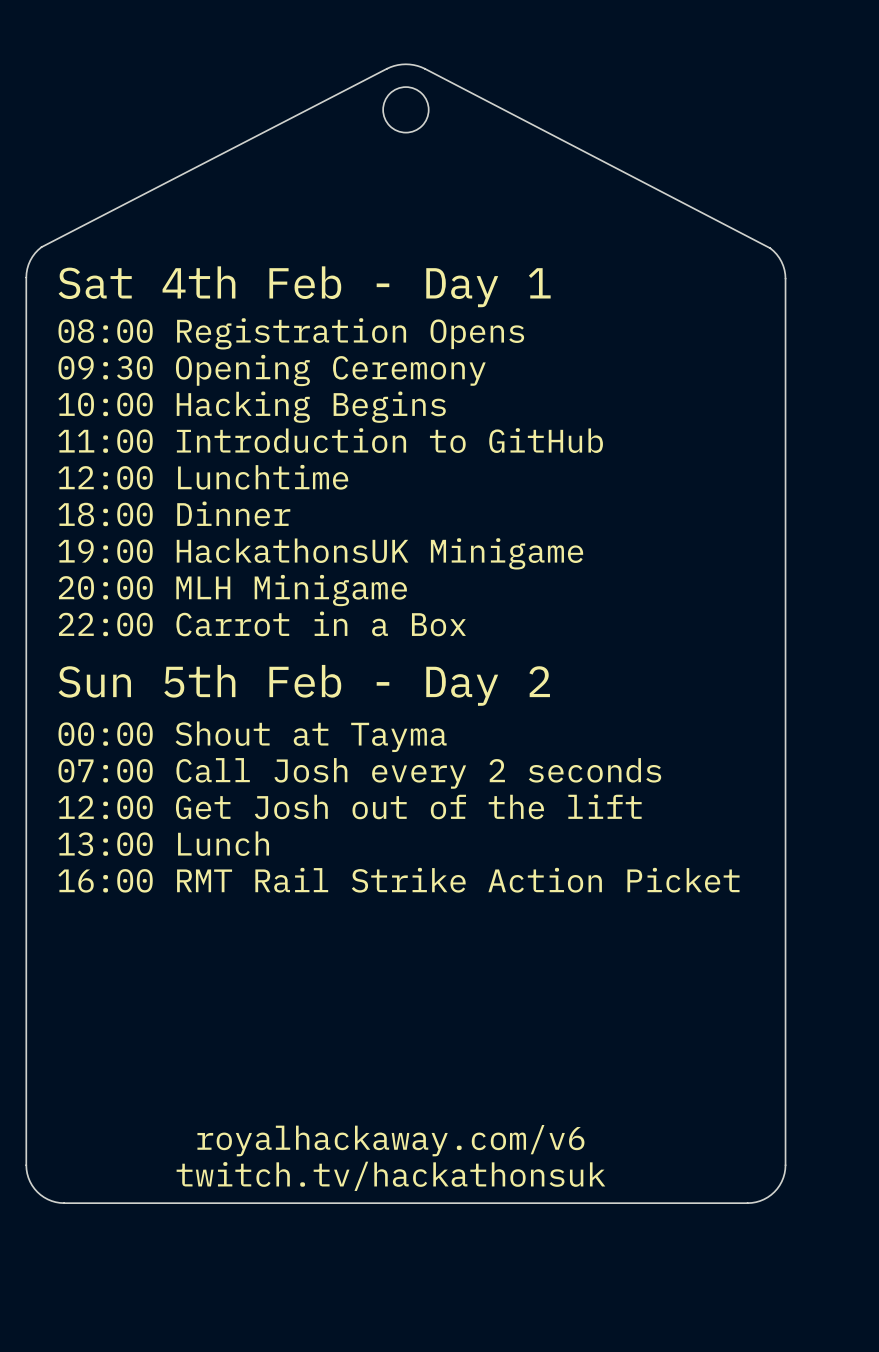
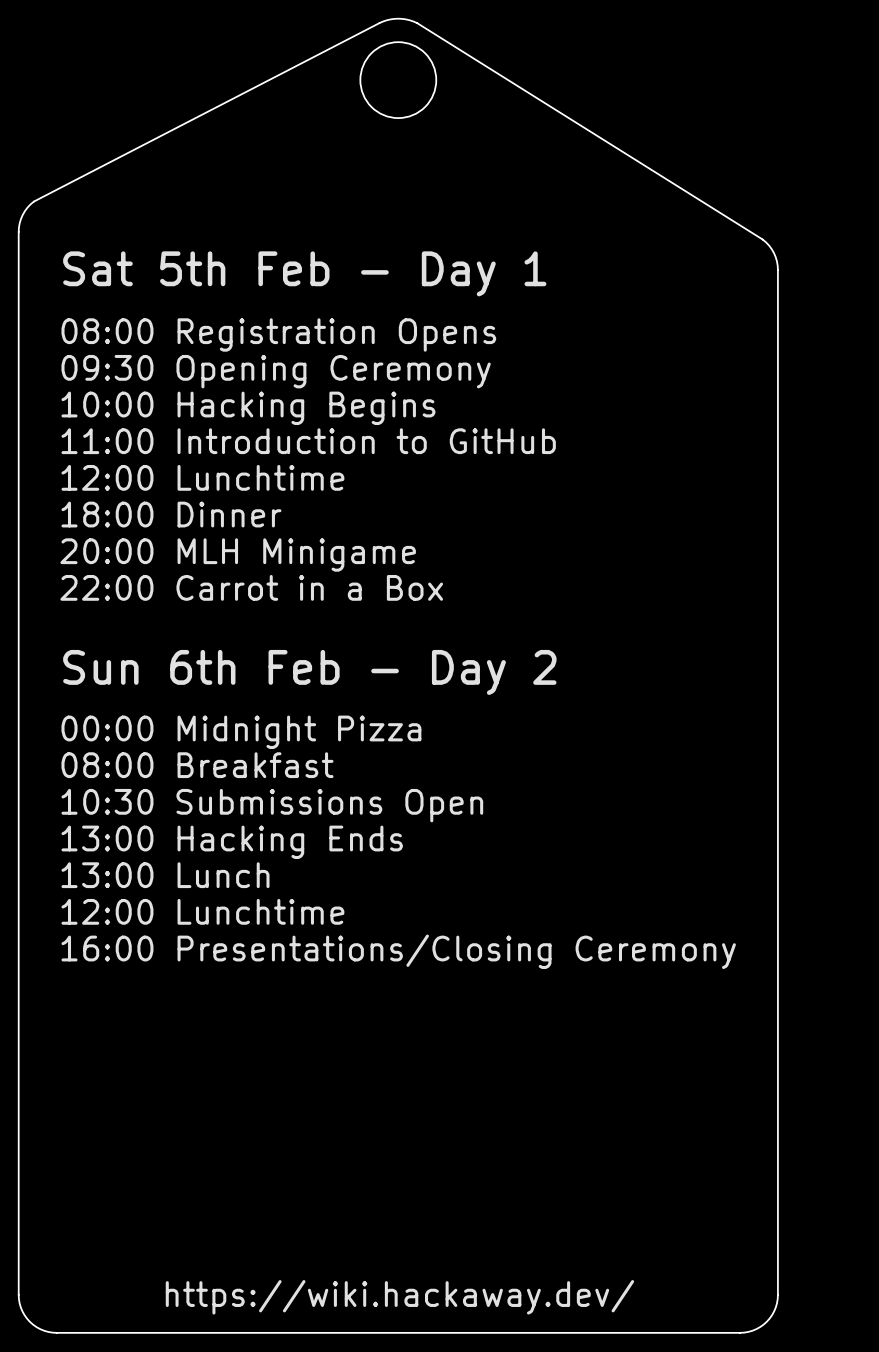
round board edge: none -> [360, 41, 437, 119]
board edge: (424, 68) (770, 248) (776, 254) (783, 265) (785, 278) (785, 1165) (783, 1177) (771, 1194) (760, 1201) (747, 1203) (64, 1203) (51, 1201) (34, 1188) (28, 1177) (26, 1165) (26, 277) (28, 264) (35, 253) (41, 247) (386, 68) (405, 64) (424, 68) -> (417, 23) (762, 239) (771, 249) (776, 261) (776, 1303) (772, 1315) (763, 1324) (752, 1330) (739, 1332) (48, 1331) (36, 1327) (26, 1318) (20, 1307) (18, 1294) (19, 223) (24, 211) (33, 201) (379, 23) (398, 18) (417, 23)
round board edge: [382, 86, 429, 133] -> none
text: Sat 4th Feb - Day 1 (304, 286) -> Sat 5th Feb - Day 1 (304, 273)
text: 19:00 HackathonsUK Minigame (320, 553) -> 20:00 MLH Minigame (238, 555)
text: 20:00 MLH Minigame (232, 590) -> 22:00 Carrot in a Box (251, 587)
text: 22:00 Carrot in a Box (262, 623) -> none
text: Sun 5th Feb - Day 2 (304, 685) -> Sun 6th Feb - Day 2 (309, 672)
text: 00:00 Shout at Tayma (252, 736) -> 00:00 Midnight Pizza (241, 732)
text: 07:00 Call Josh every 2 seconds (359, 773) -> 08:00 Breakfast (197, 765)
text: 12:00 Get Josh out of the lift (350, 806) -> 10:30 Submissions Open (272, 805)
text: none -> 13:00 Hacking Ends (232, 842)
text position: 13:00 Lunch (163, 843) -> 13:00 Lunch (165, 875)
text: 16:00 RMT Rail Strike Action Picket (398, 880) -> none
text: none -> 12:00 Lunchtime (202, 911)
text: none -> 16:00 Presentations/Closing Ceremony (398, 951)
text: royalhackaway.com/v6 (390, 1140) -> none
text: twitch.tv/hackathonsuk (390, 1176) -> none
text: none -> https://wiki.hackaway.dev/ (399, 1297)

